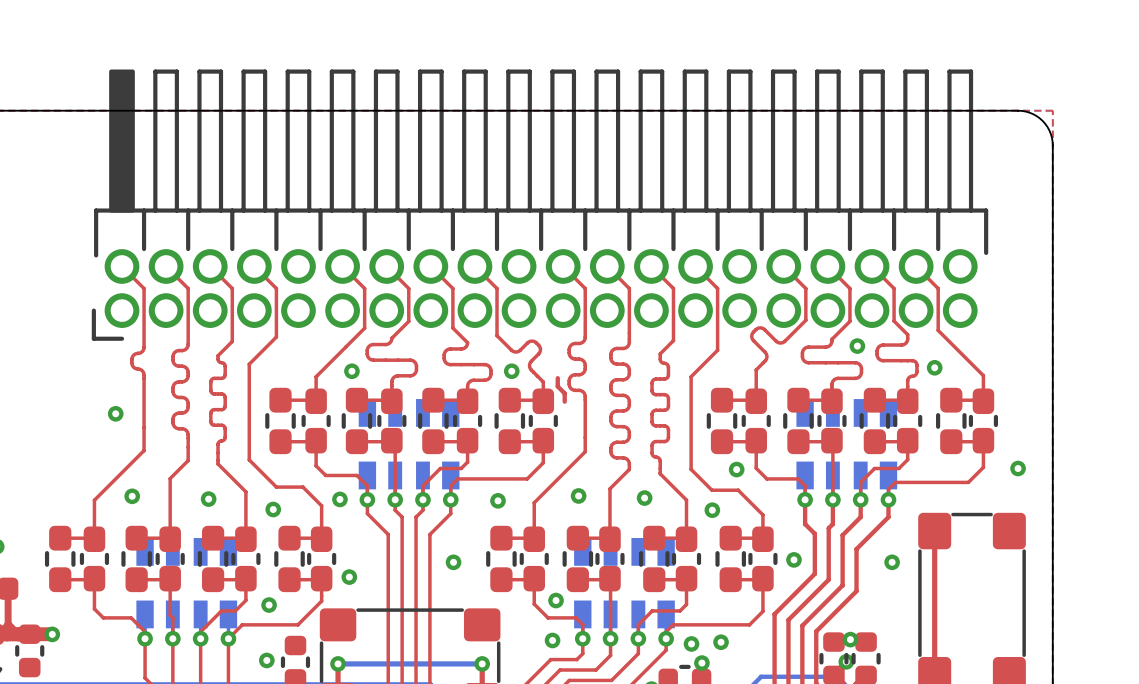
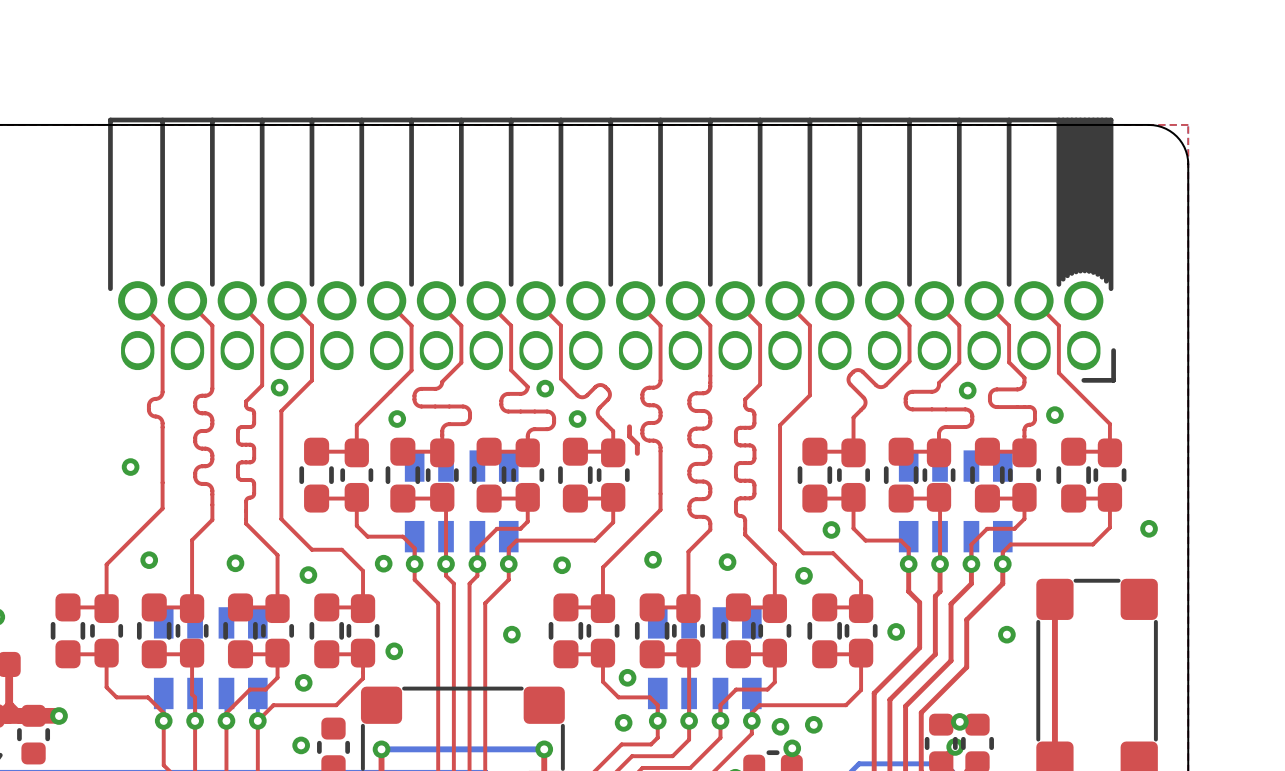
part footprint: [91, 69, 989, 341] -> [108, 117, 1116, 383]
via: none -> (279, 387)
via: none -> (545, 388)

